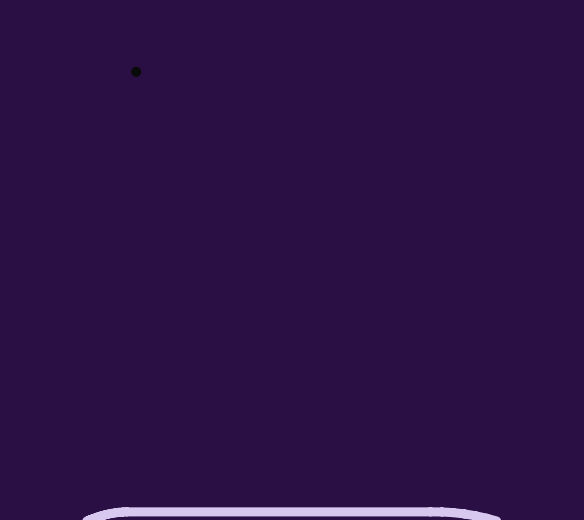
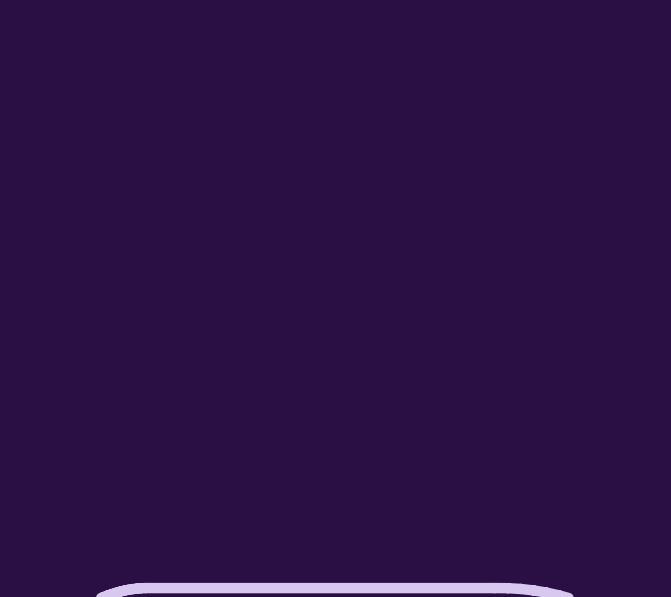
via: (136, 71) -> none

